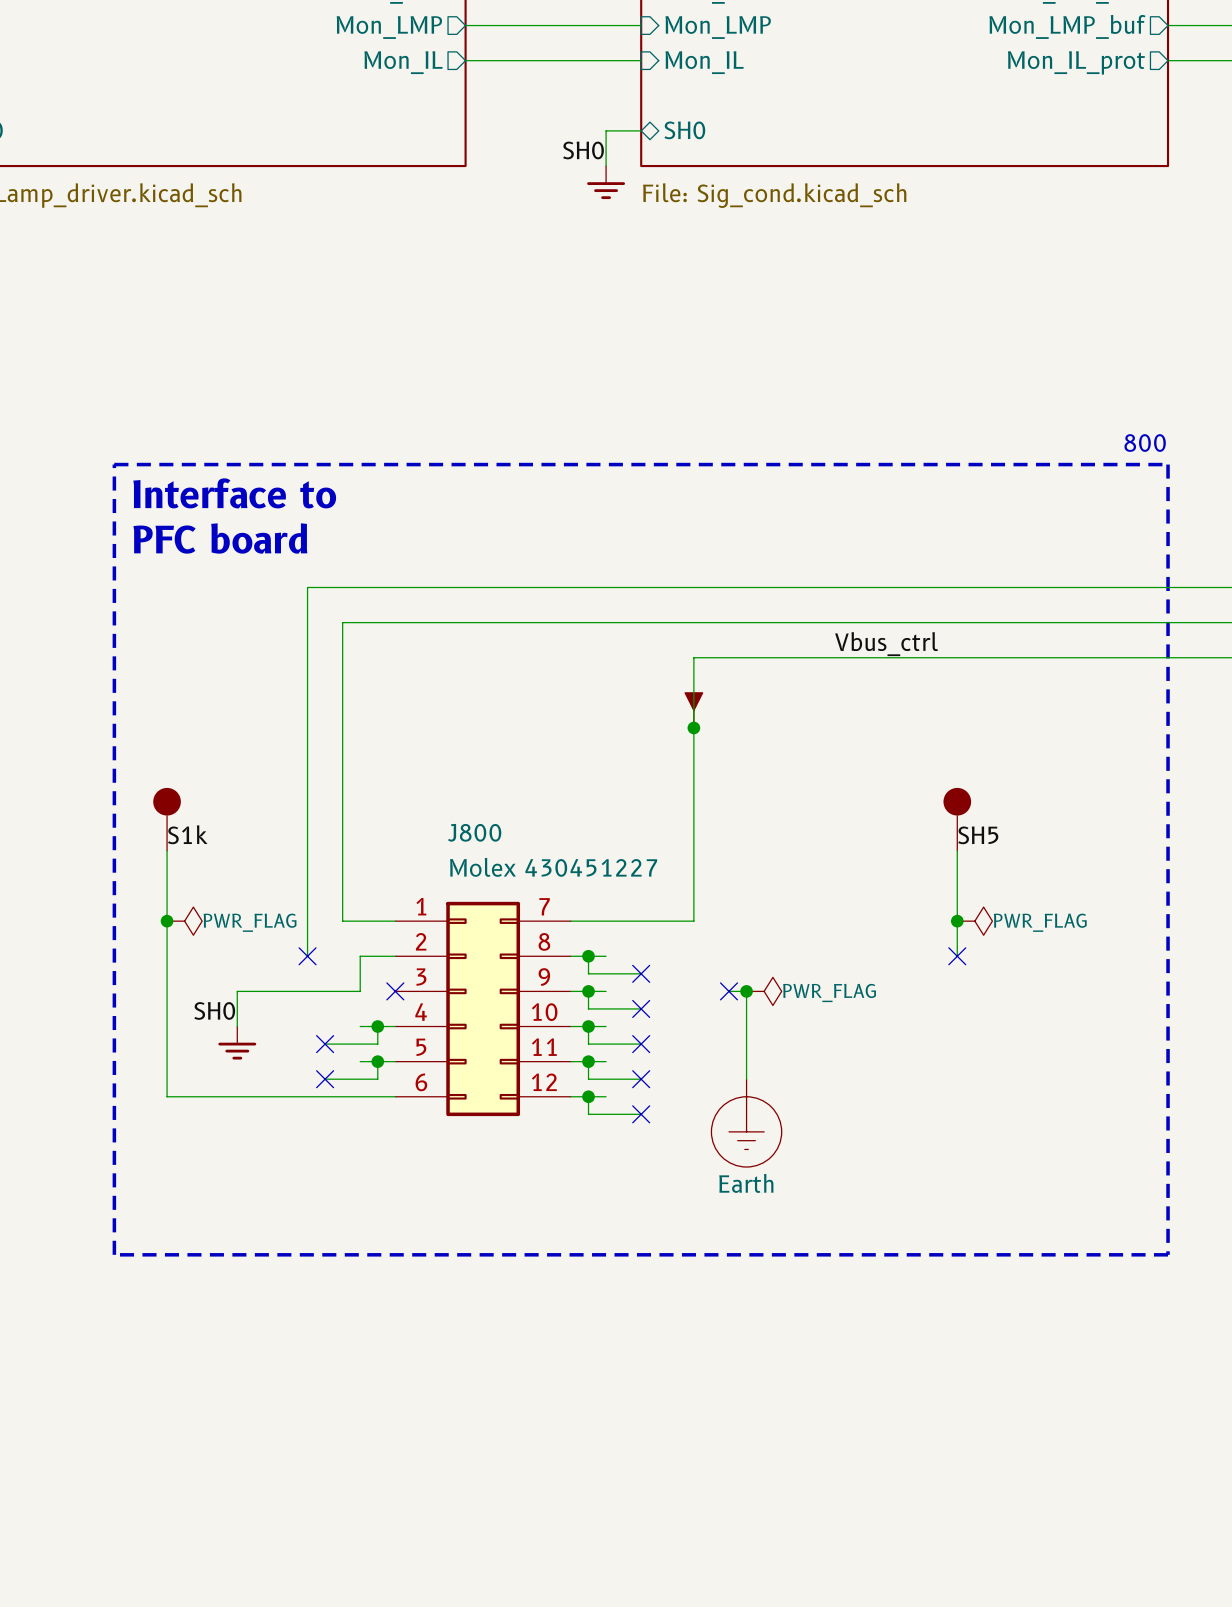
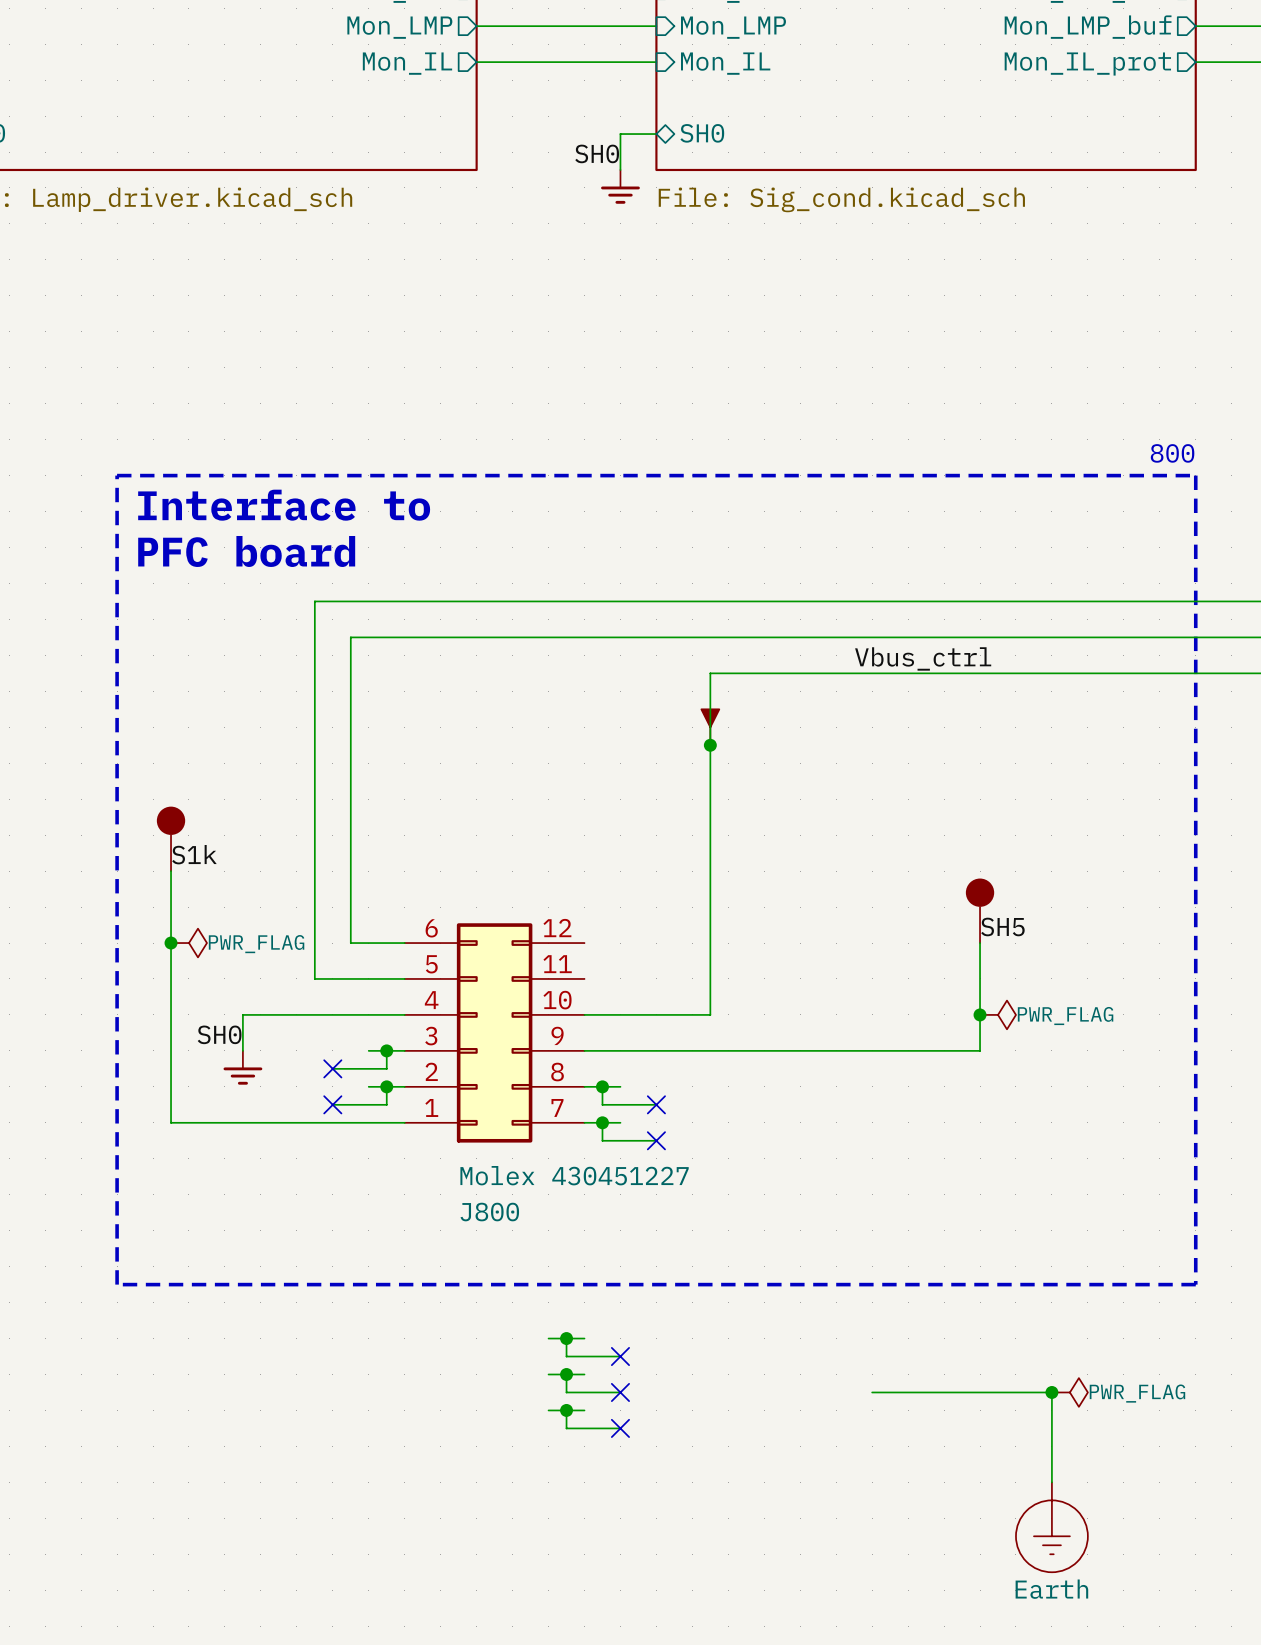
part position: (957, 819) -> (980, 910)
label position: SH5 (978, 835) -> SH5 (1002, 926)
wire: (570, 921) (693, 921) -> (620, 1014) (710, 1014) (710, 943)
junction position: (957, 921) -> (980, 1014)
power symbol position: PWR_FLAG (974, 921) -> PWR_FLAG (998, 1014)
wire: none -> (314, 978) (368, 978)
no-connect mark: (307, 956) -> none
wire: (360, 956) (360, 991) -> (404, 1014) (368, 1014)
wire: (570, 956) (606, 956) -> none
wire: (588, 956) (588, 973) (641, 973) -> none
junction: (588, 956) -> none
wire: none -> (980, 978) (980, 1050) (620, 1050)
no-connect mark: (957, 956) -> none
no-connect mark: (641, 973) -> none
no-connect mark: (395, 991) -> none
wire: (588, 991) (588, 1008) (641, 1008) -> (566, 1338) (566, 1356) (620, 1356)
junction: (588, 991) -> none
wire: (729, 991) (746, 991) (746, 1079) -> none
no-connect mark: (729, 991) -> none
junction: (746, 991) -> none
power symbol: PWR_FLAG (764, 991) -> none
J800 flip: as is (483, 1008) -> up-down (494, 1032)
no-connect mark: (641, 1008) -> none
wire: (588, 1026) (588, 1044) (641, 1044) -> (566, 1374) (566, 1392) (620, 1392)
junction: (588, 1026) -> none
no-connect mark: (641, 1044) -> none
power symbol: Earth (746, 1123) -> none
wire: none -> (548, 1338) (584, 1338)
junction: none -> (566, 1338)
no-connect mark: none -> (620, 1356)
wire: none -> (548, 1374) (584, 1374)
junction: none -> (566, 1374)
no-connect mark: none -> (620, 1392)
wire: none -> (872, 1392) (1051, 1392) (1051, 1482)
junction: none -> (1051, 1392)
power symbol: none -> PWR_FLAG (1069, 1392)
wire: none -> (548, 1410) (584, 1410)
wire: none -> (566, 1410) (566, 1428) (620, 1428)
junction: none -> (566, 1410)
no-connect mark: none -> (620, 1428)
power symbol: none -> Earth (1051, 1527)

